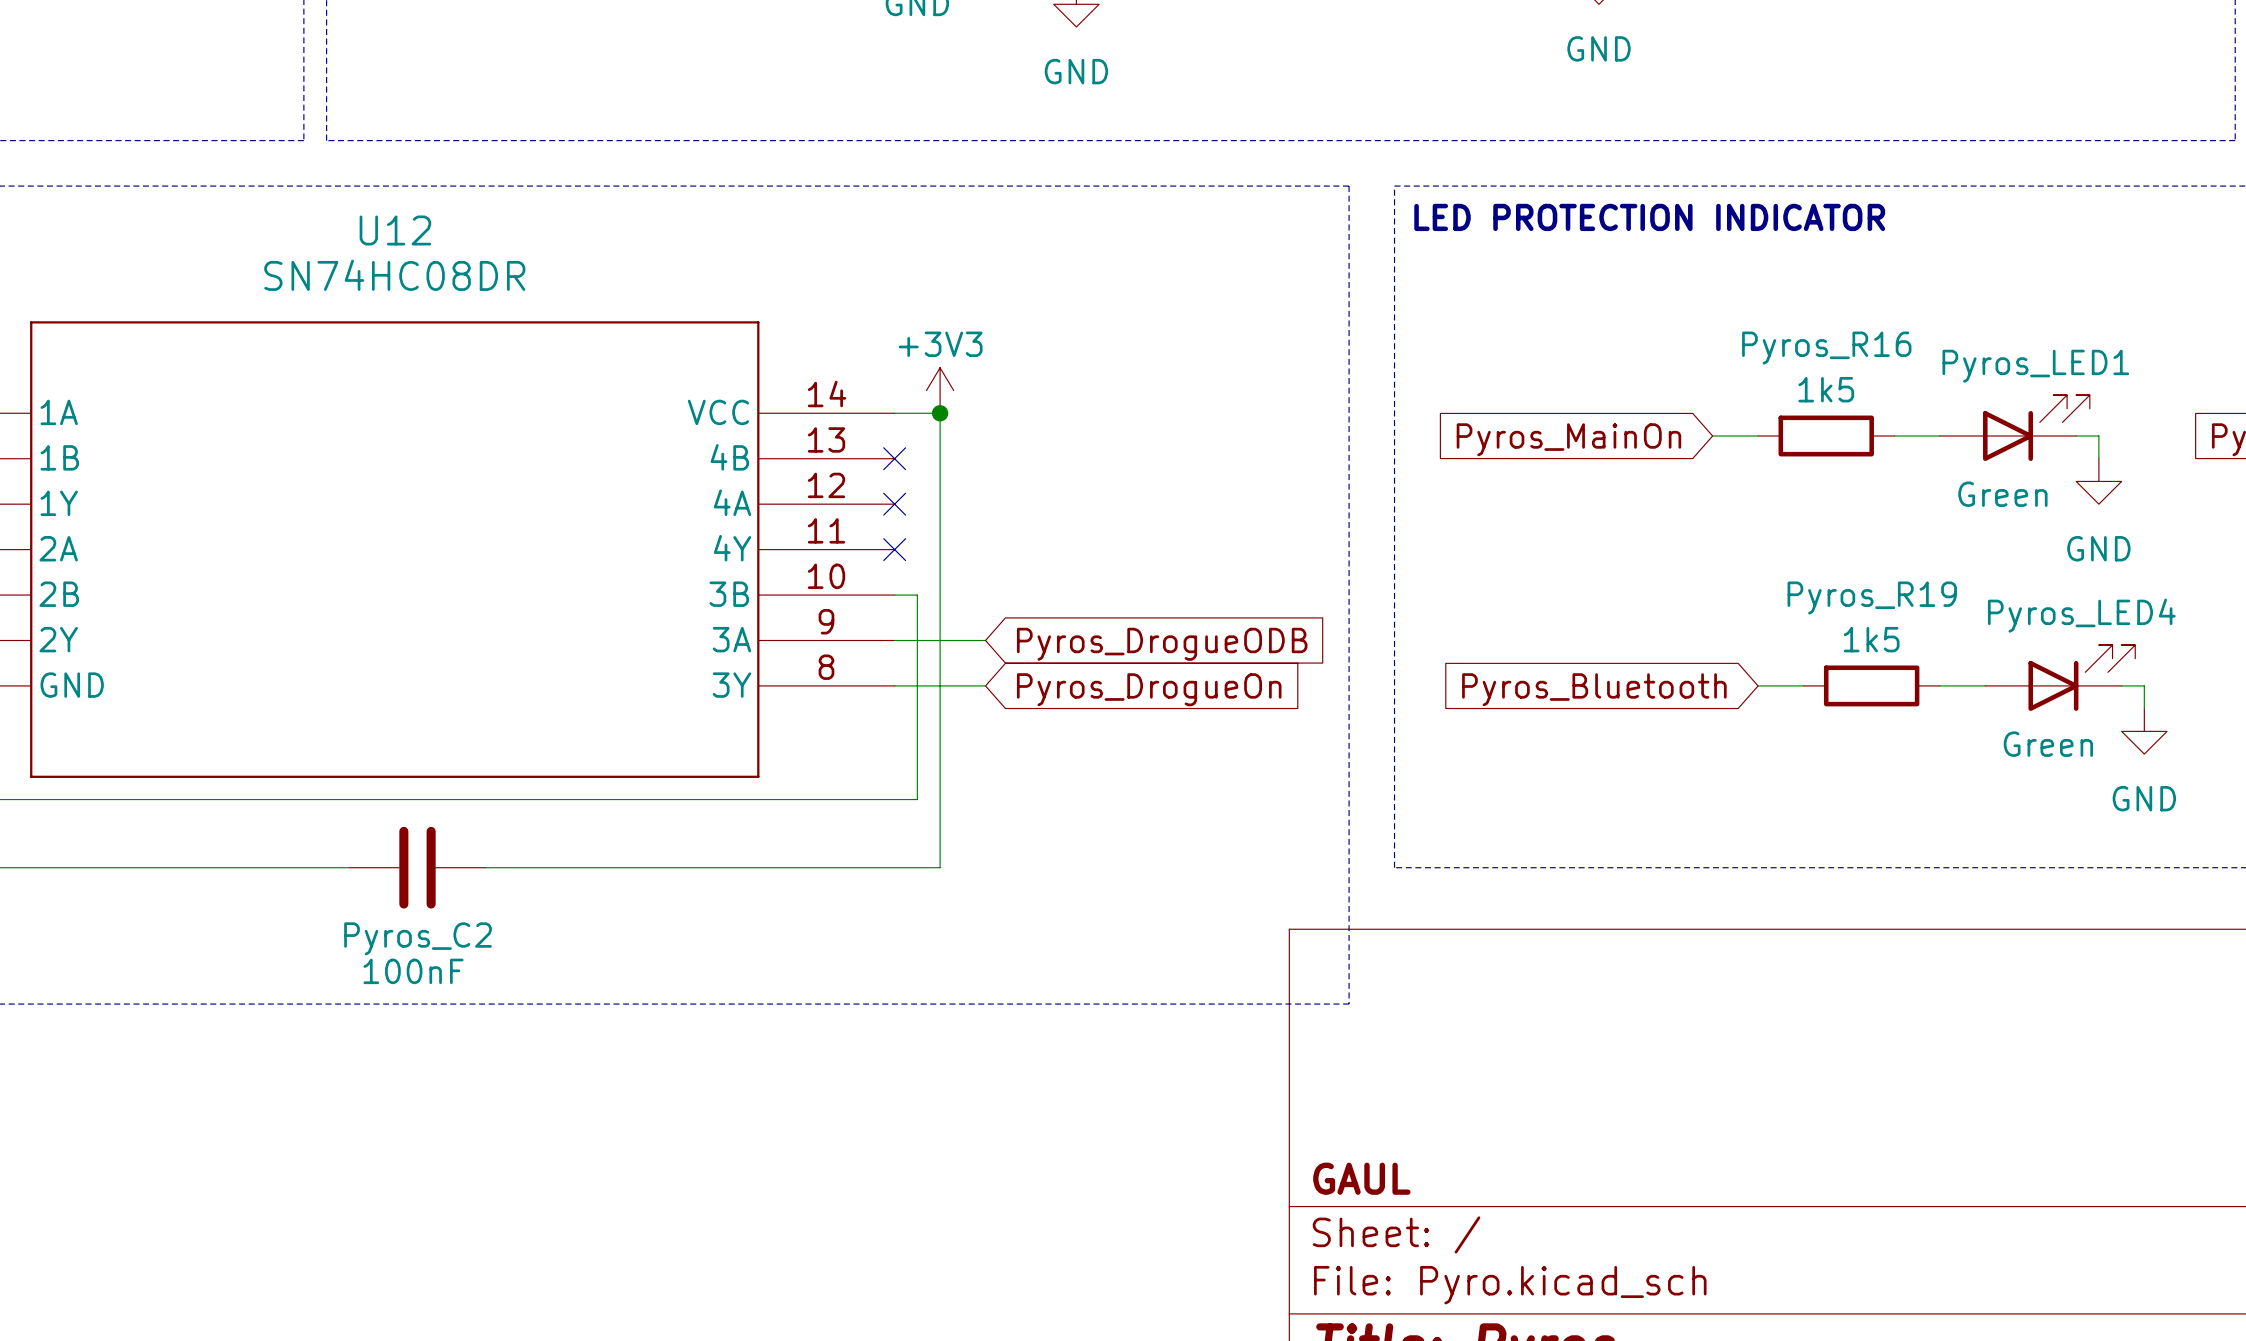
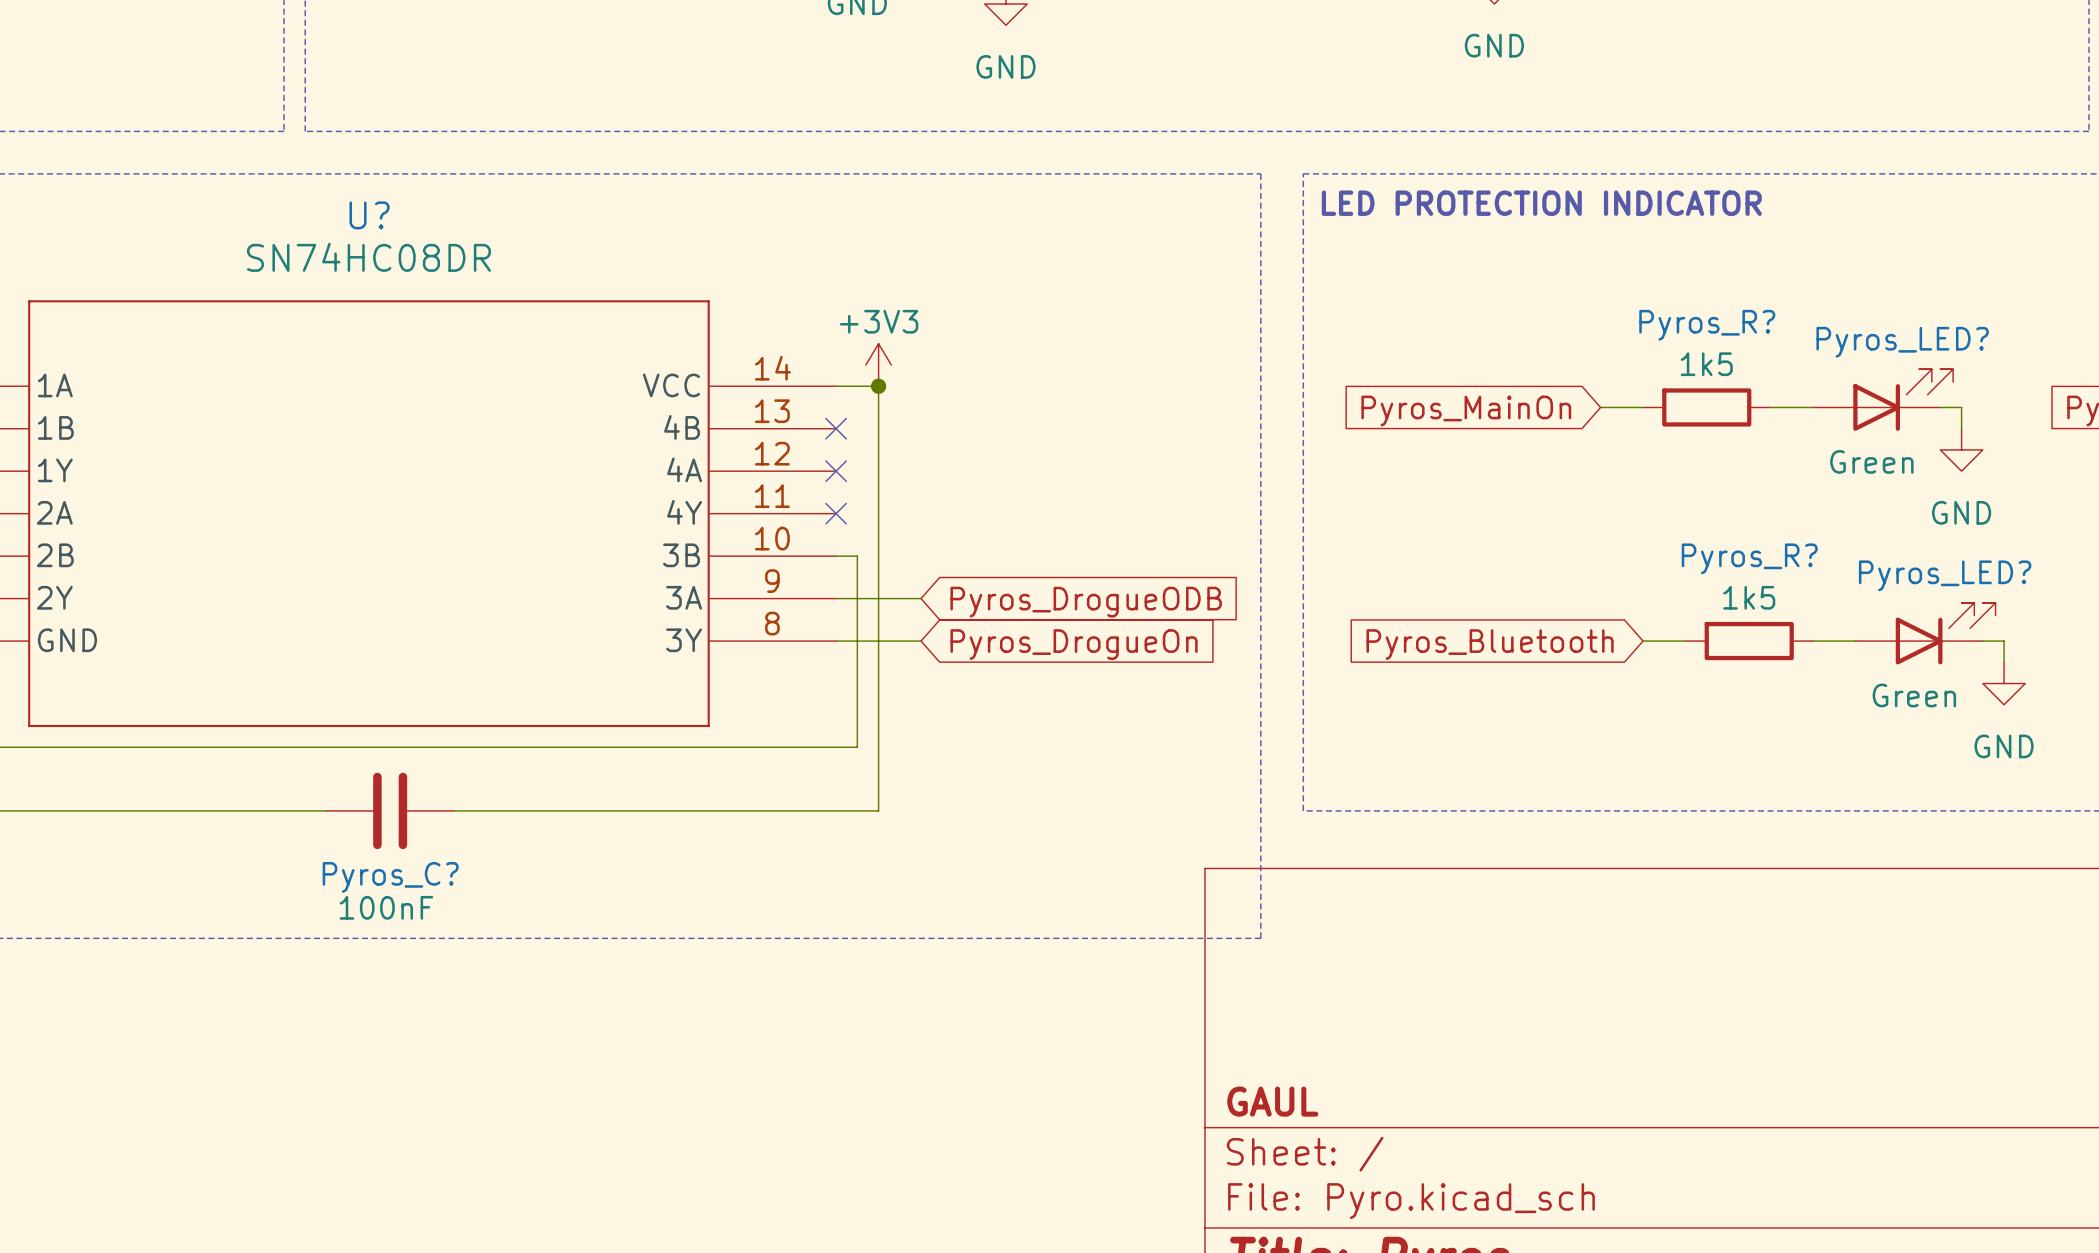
U12 name: U12 (395, 230) -> U? (369, 215)
Pyros_R16 name: Pyros_R16 (1826, 348) -> Pyros_R? (1707, 325)
Pyros_LED1 name: Pyros_LED1 (2035, 366) -> Pyros_LED? (1902, 342)
Pyros_R19 name: Pyros_R19 (1872, 597) -> Pyros_R? (1749, 558)
Pyros_LED4 name: Pyros_LED4 (2081, 615) -> Pyros_LED? (1945, 575)
Pyros_C2 name: Pyros_C2 (418, 938) -> Pyros_C? (390, 877)

